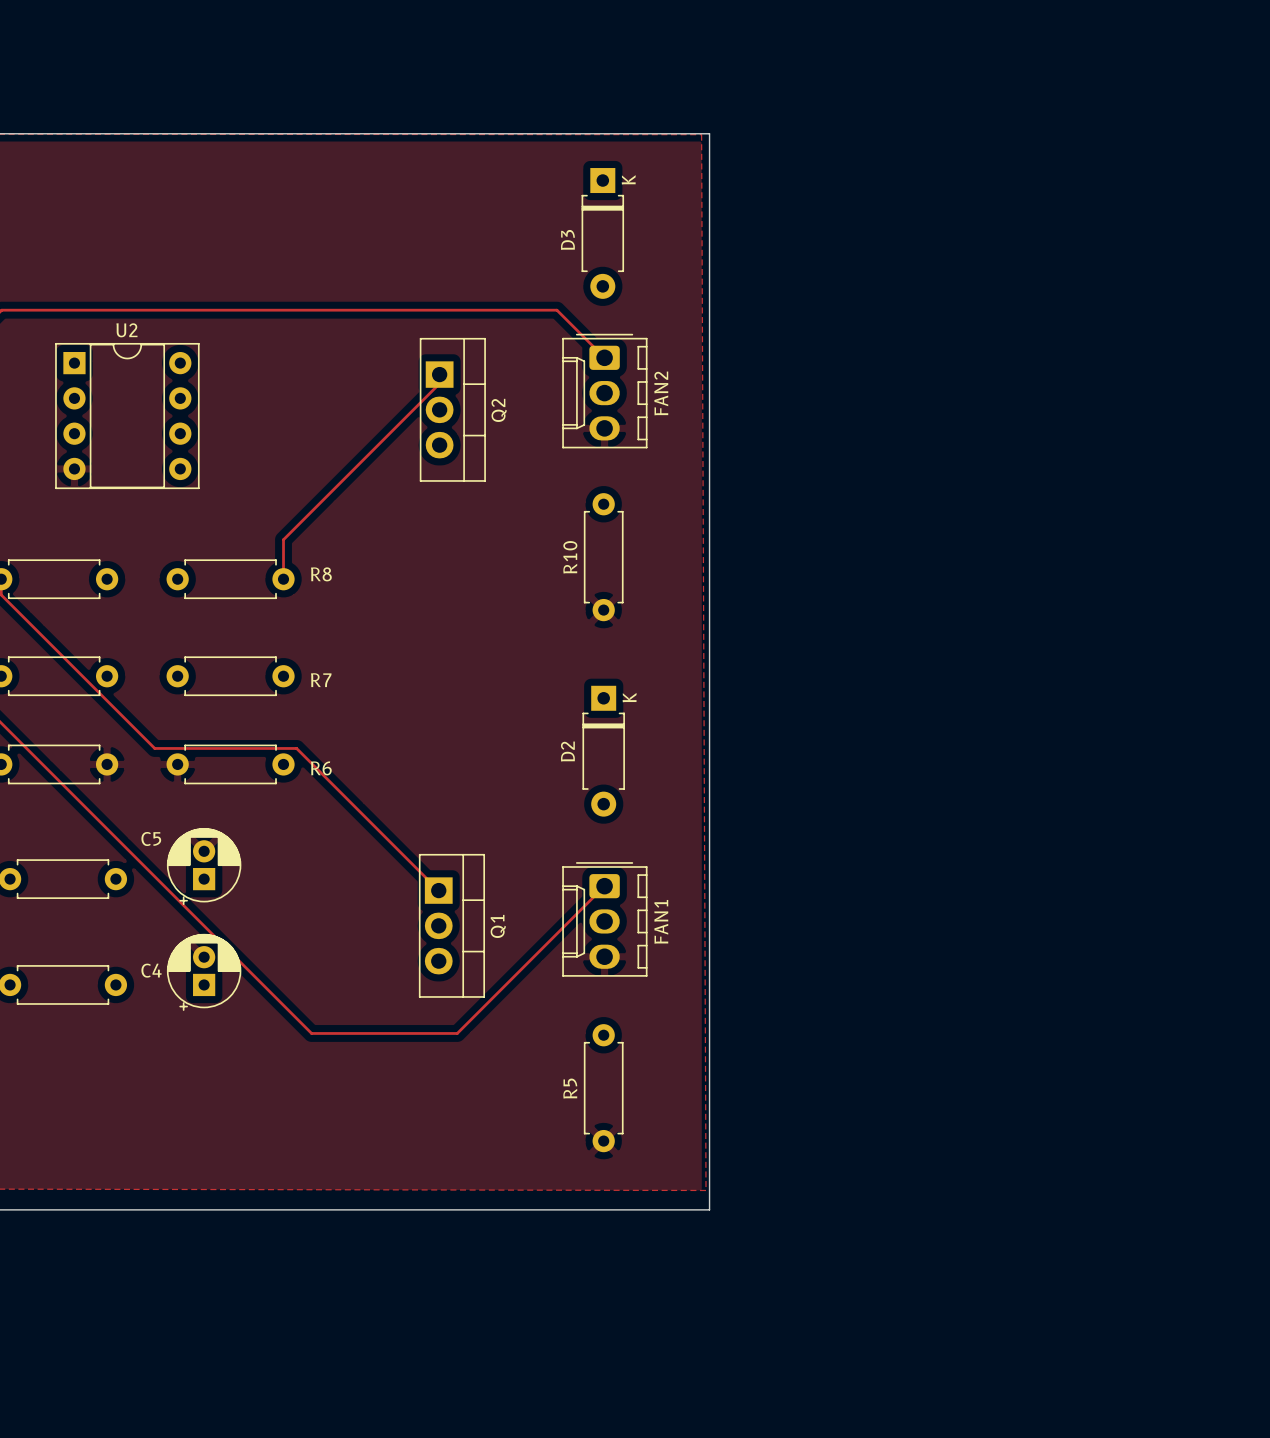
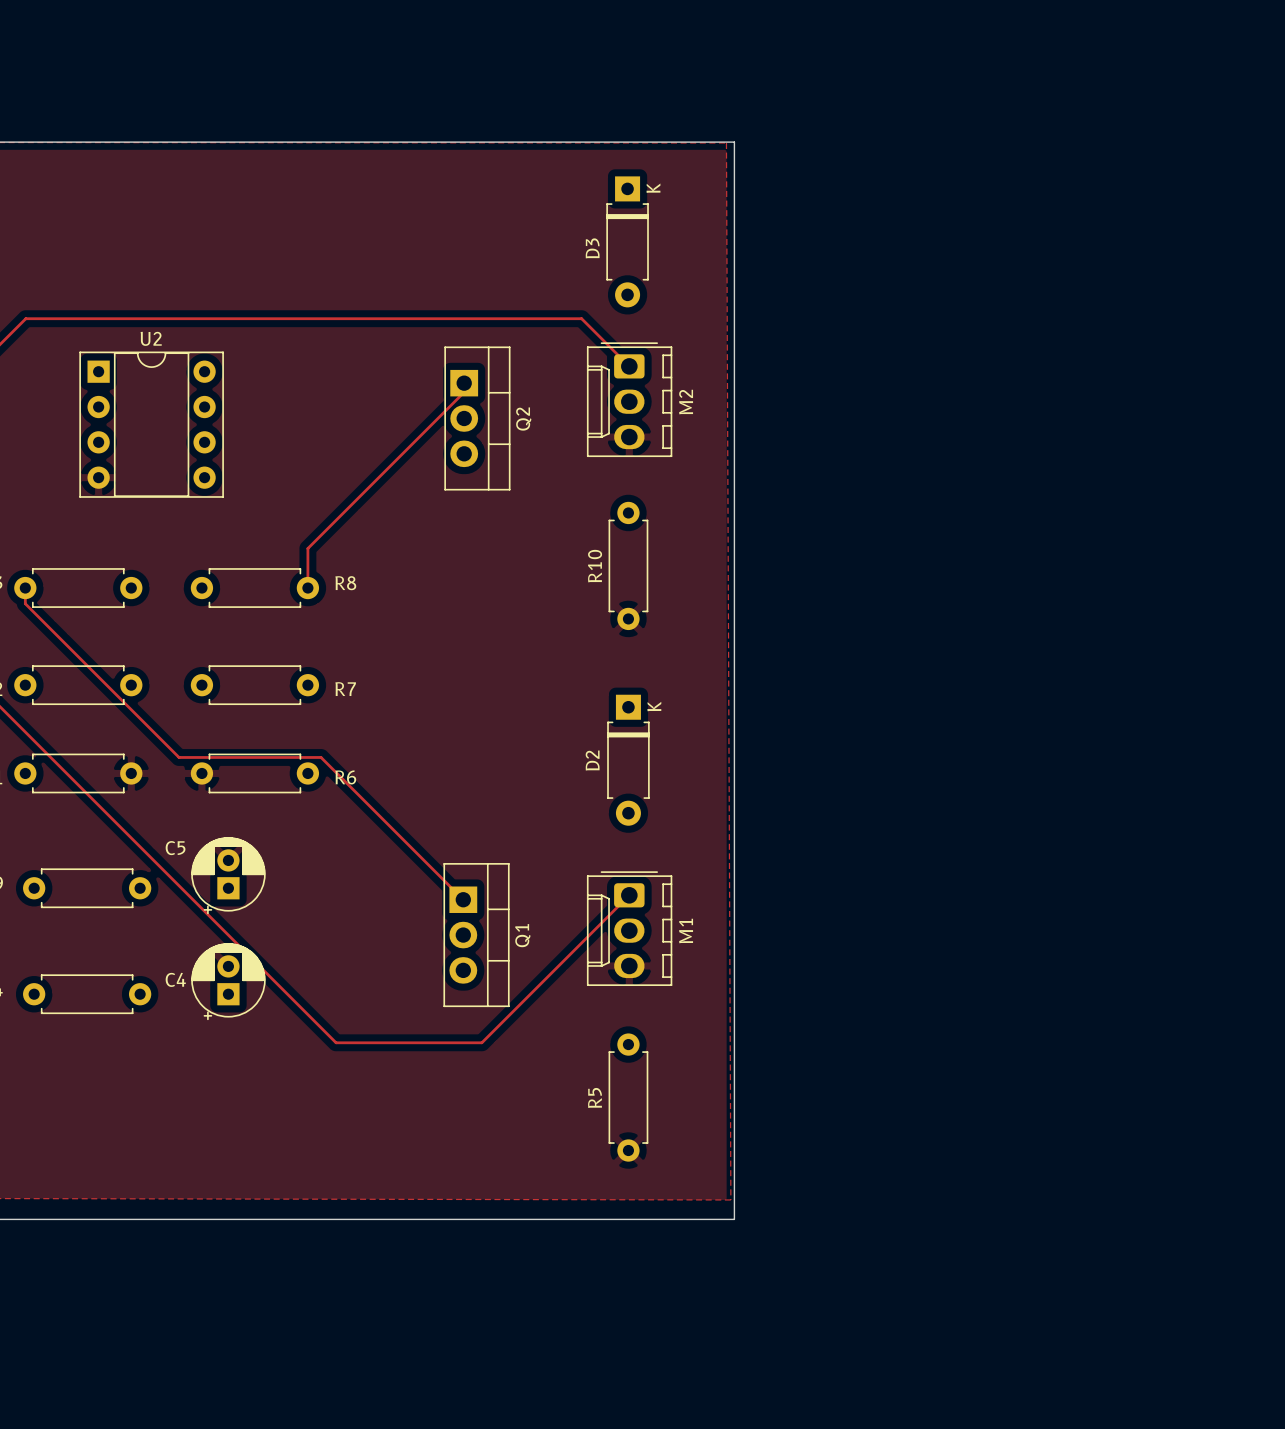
FAN2 name: FAN2 (661, 393) -> M2 (686, 402)
FAN1 name: FAN1 (661, 921) -> M1 (686, 931)

